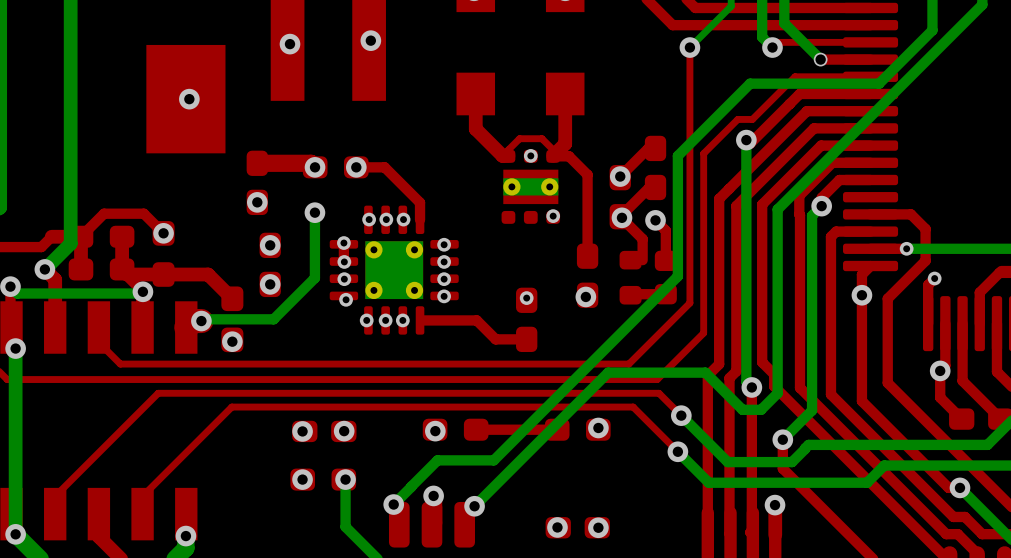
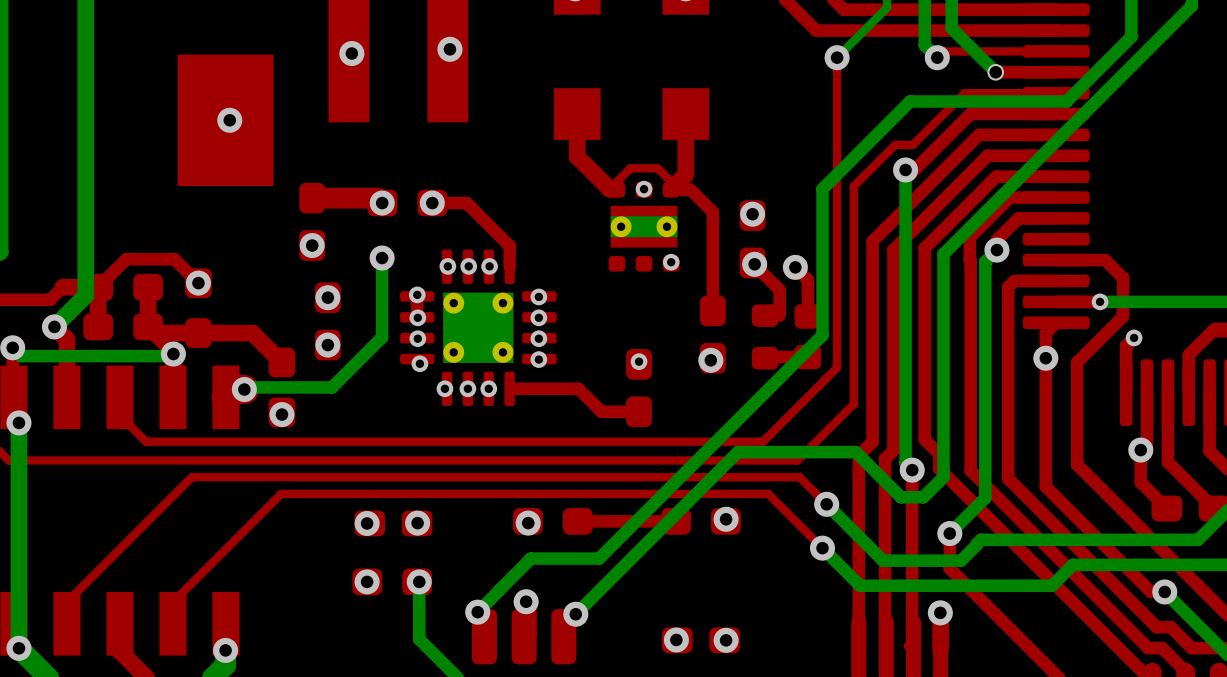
top track: (655, 148) (648, 148) (620, 176) -> none
part: (655, 167) -> none
top track: (655, 187) (649, 187) (620, 216) -> none

